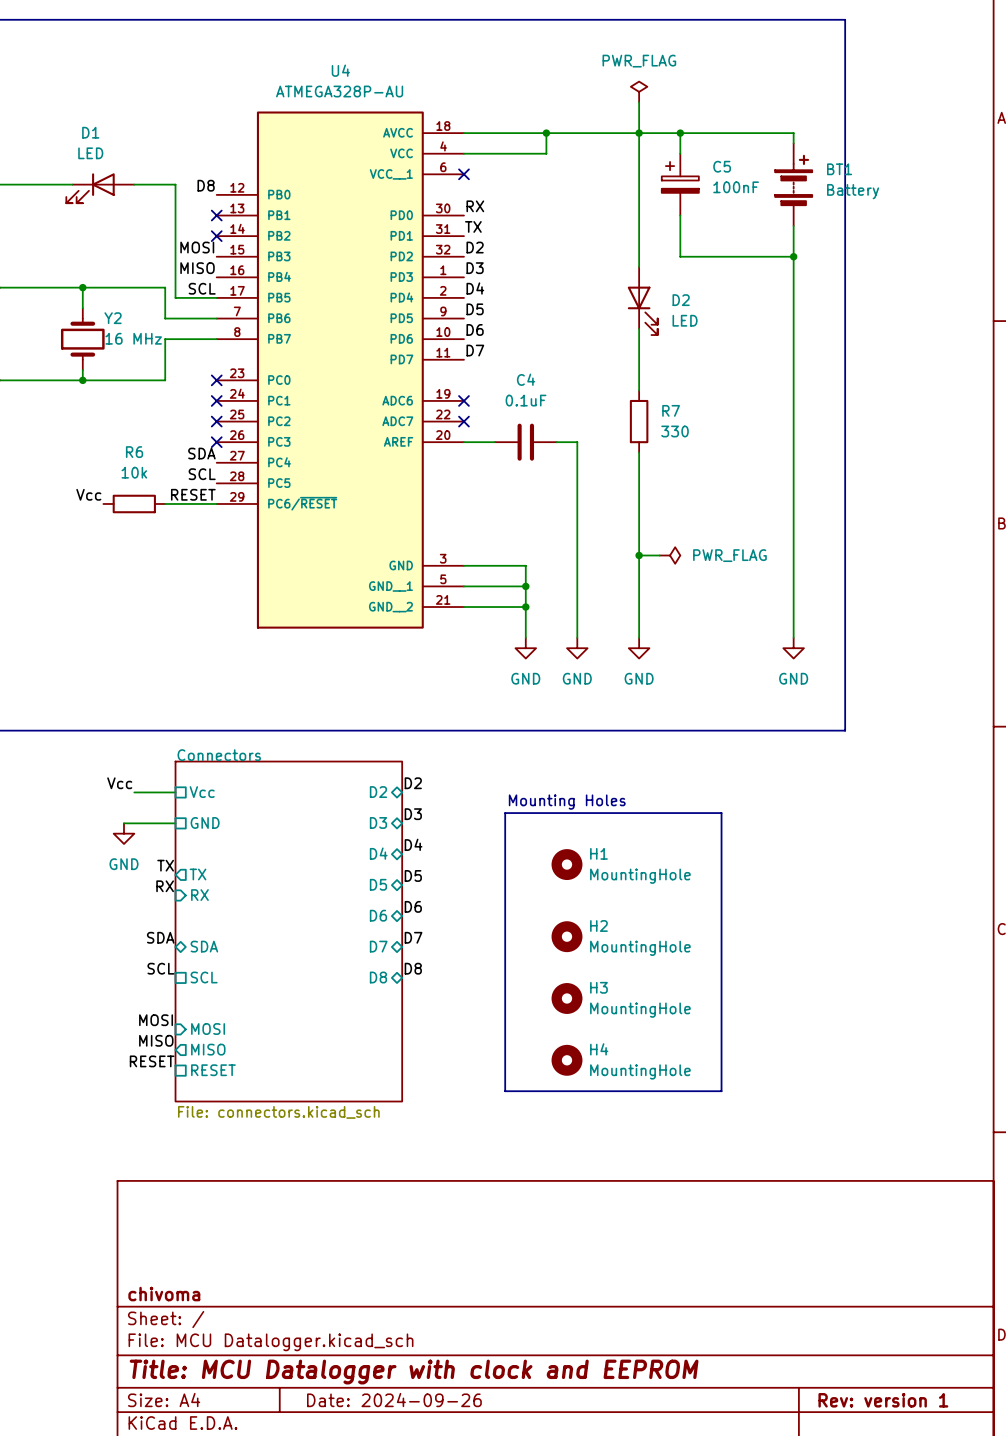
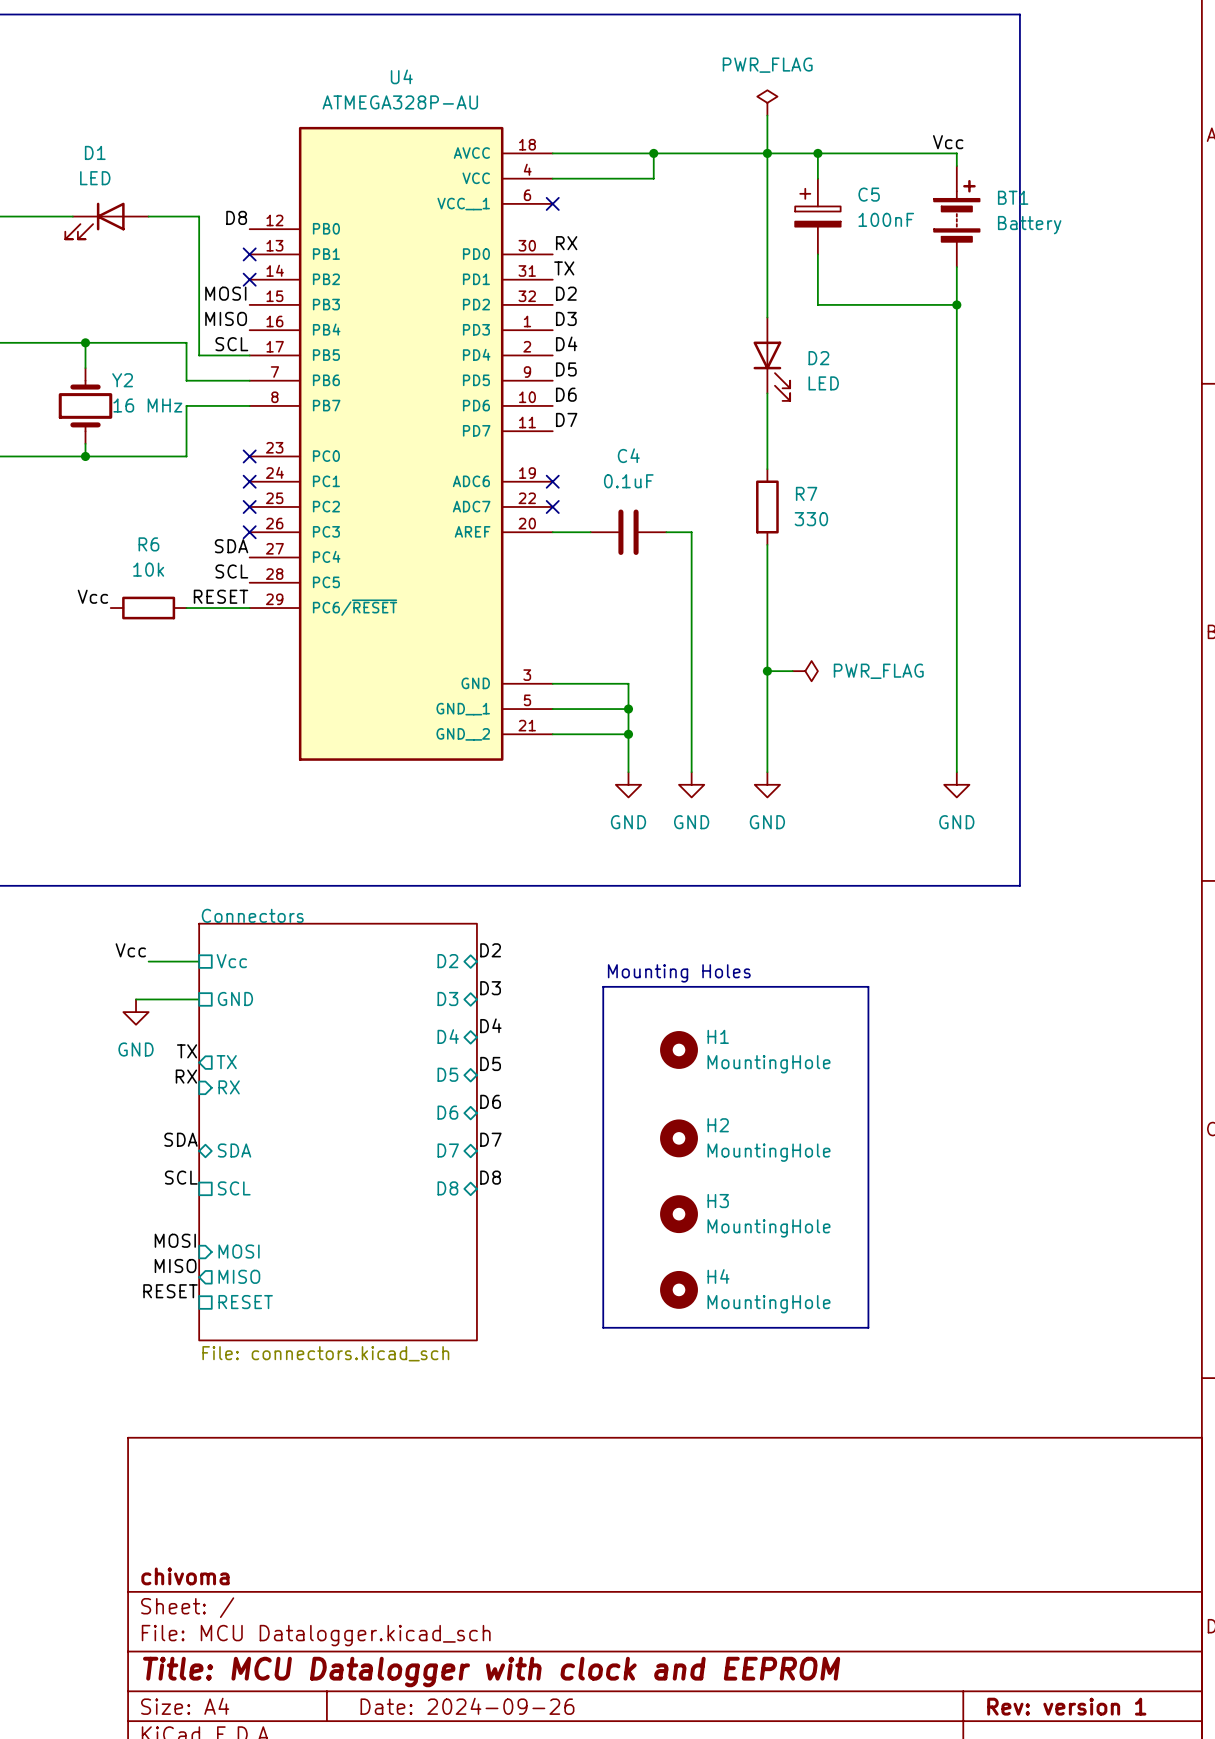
label: none -> Vcc (948, 142)

